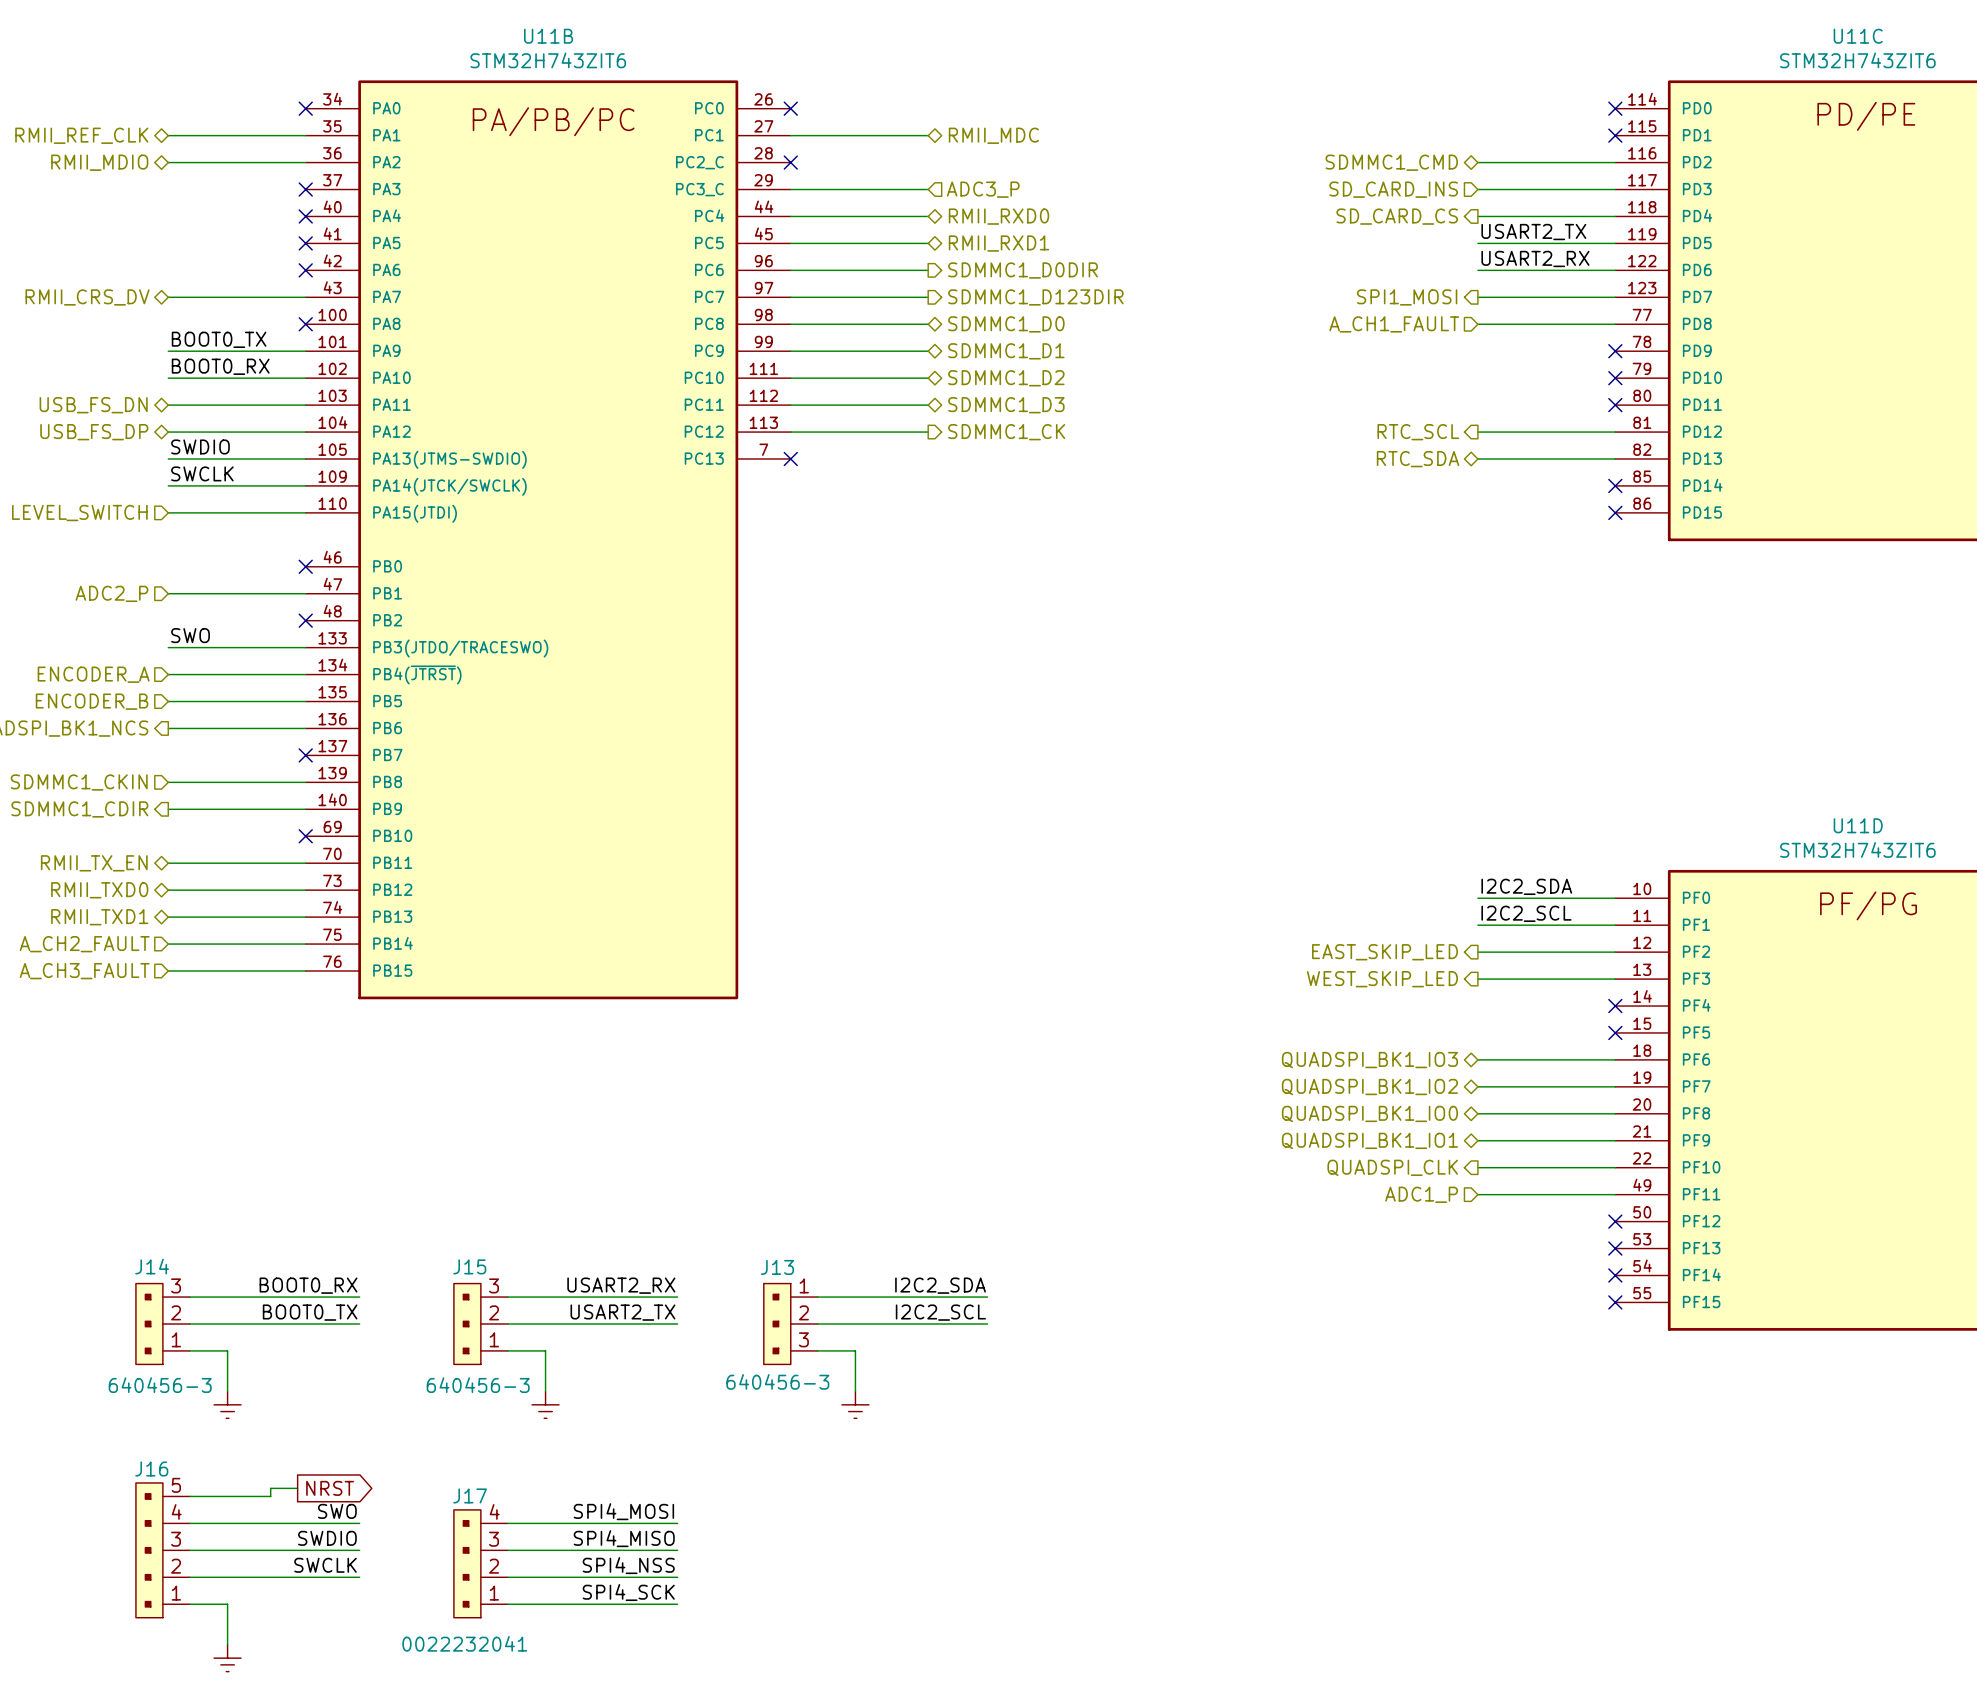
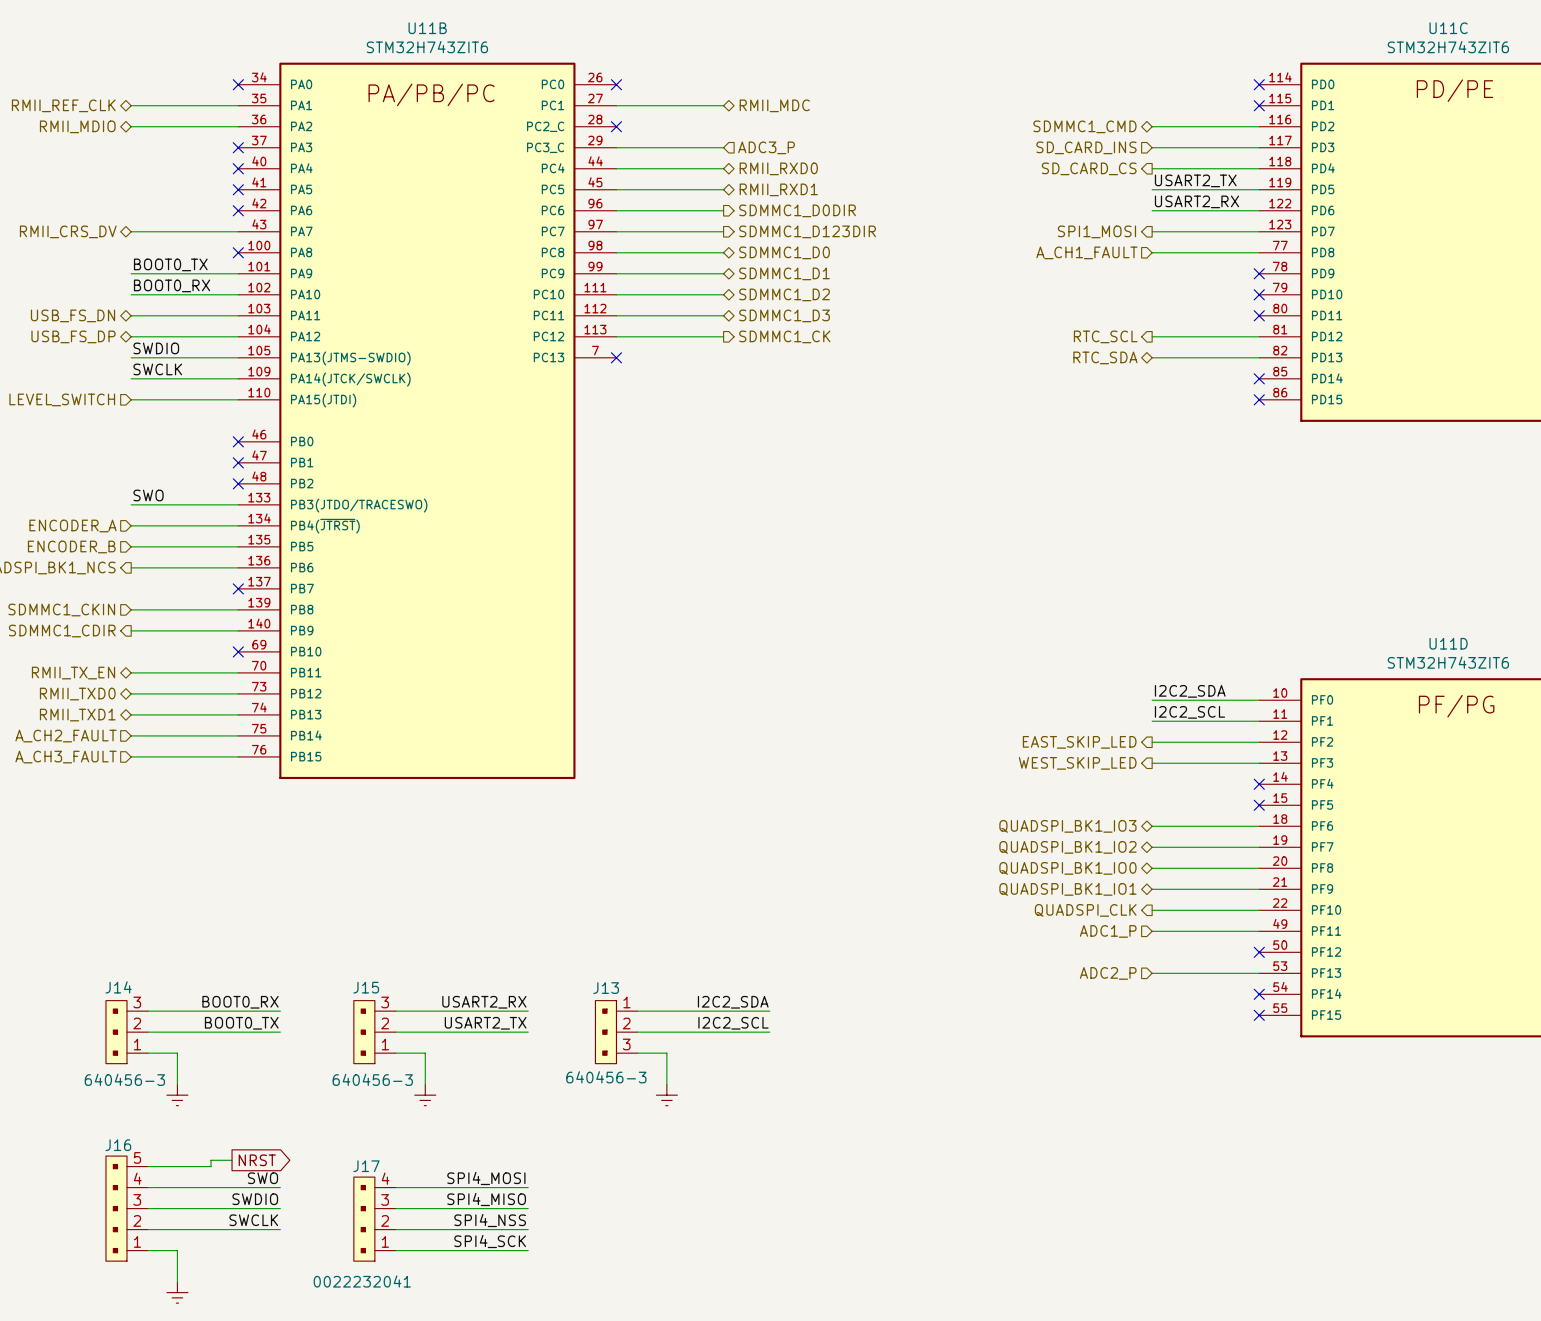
hierarchical label: ADC2_P (111, 593) -> none
wire: (168, 593) (305, 593) -> none
no-connect mark: none -> (238, 462)
hierarchical label: none -> ADC2_P (1108, 973)
wire: none -> (1152, 973) (1259, 973)
no-connect mark: (1615, 1248) -> none

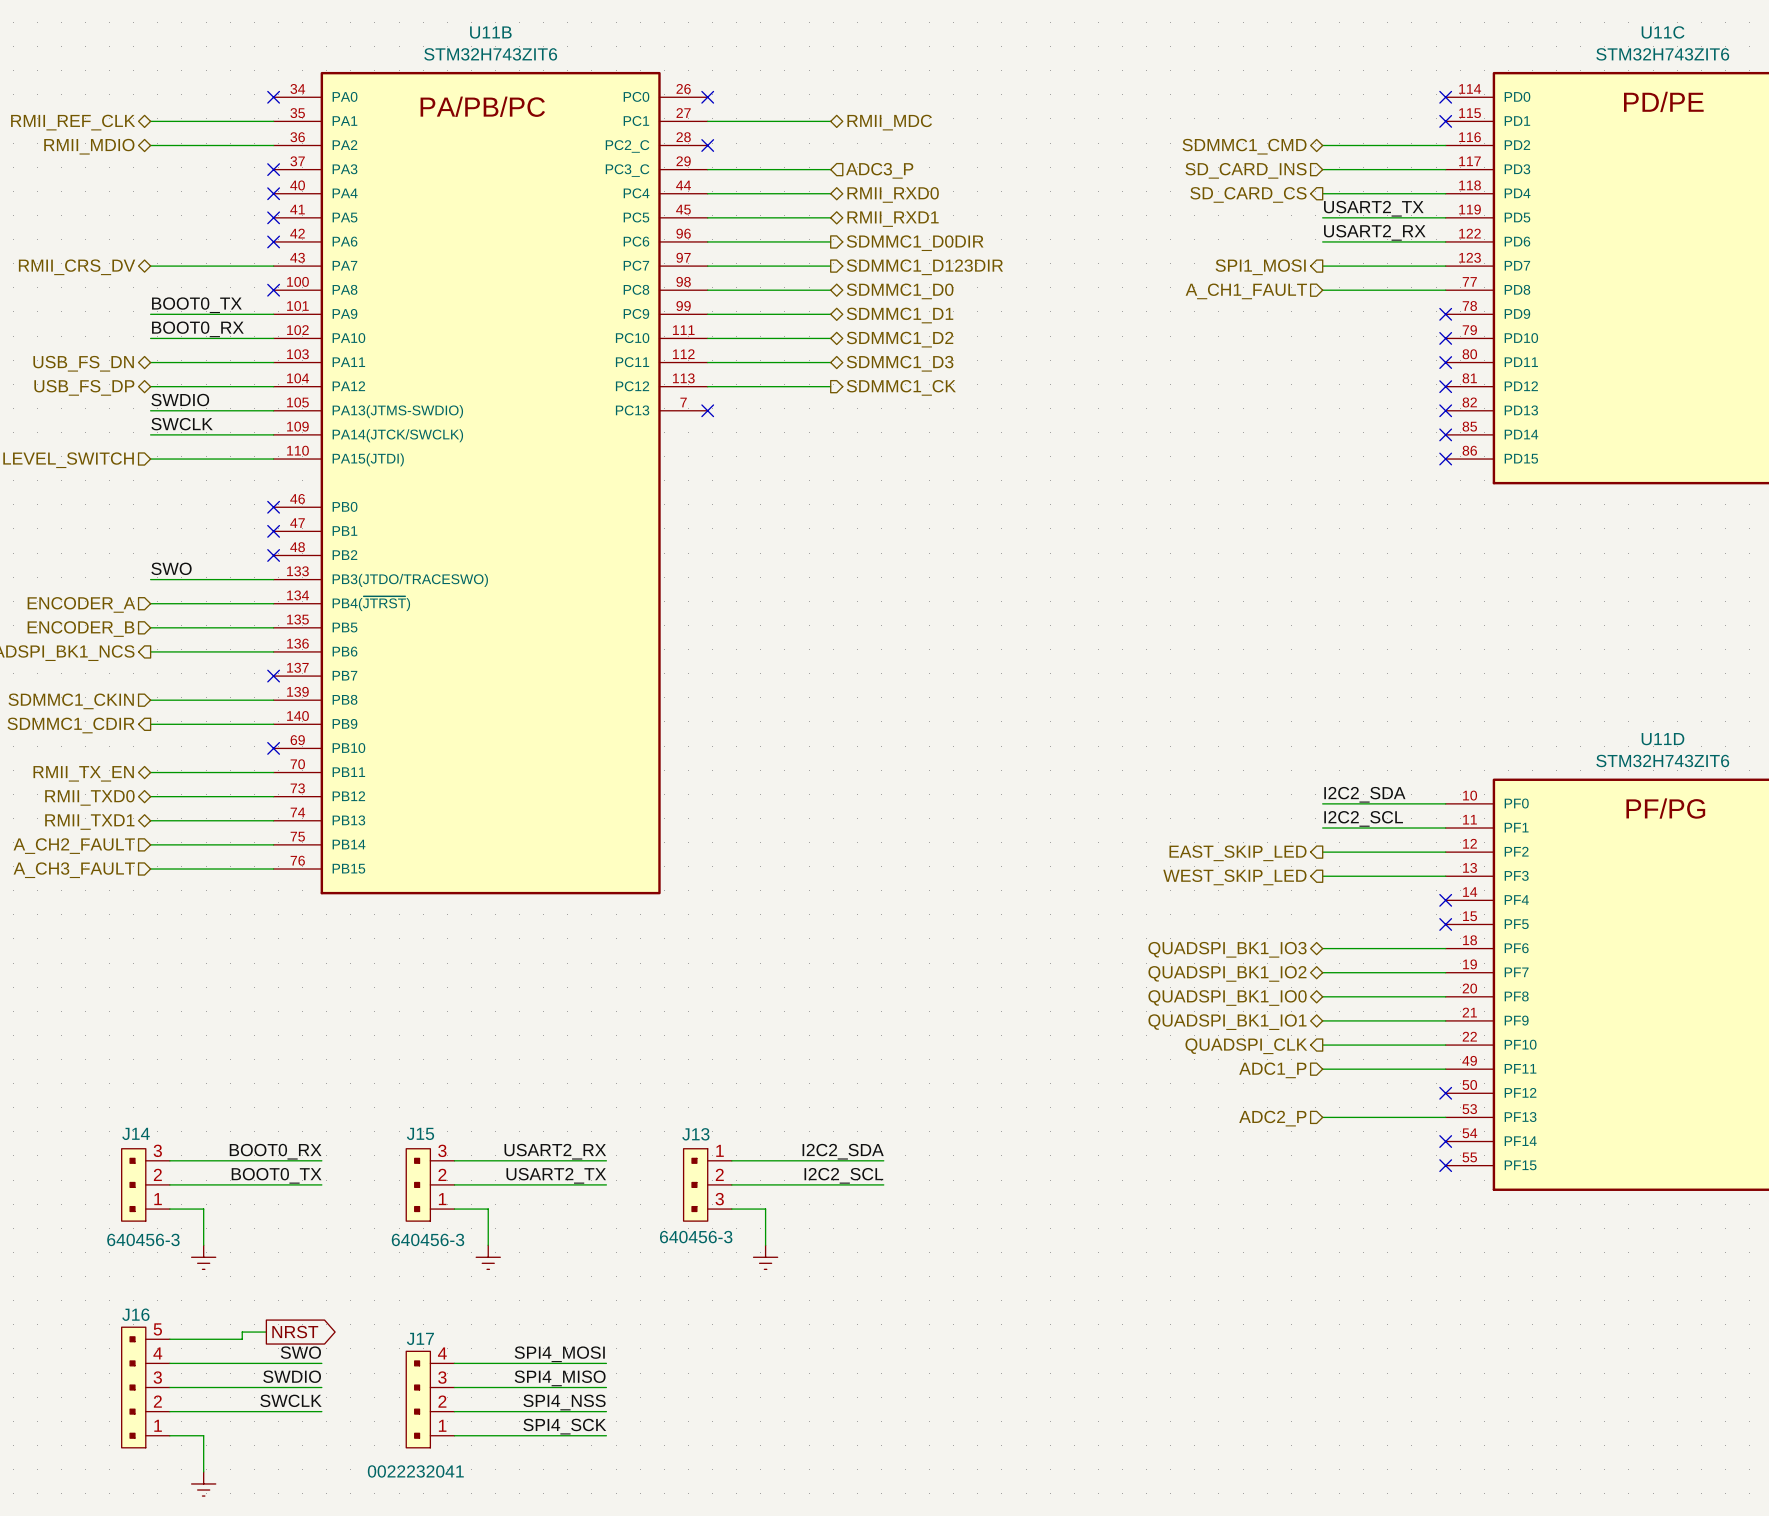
hierarchical label: RTC_SCL (1105, 336) -> none
wire: (1152, 336) (1259, 336) -> none
no-connect mark: none -> (1445, 386)
hierarchical label: RTC_SDA (1105, 357) -> none
wire: (1152, 357) (1259, 357) -> none
no-connect mark: none -> (1445, 410)

